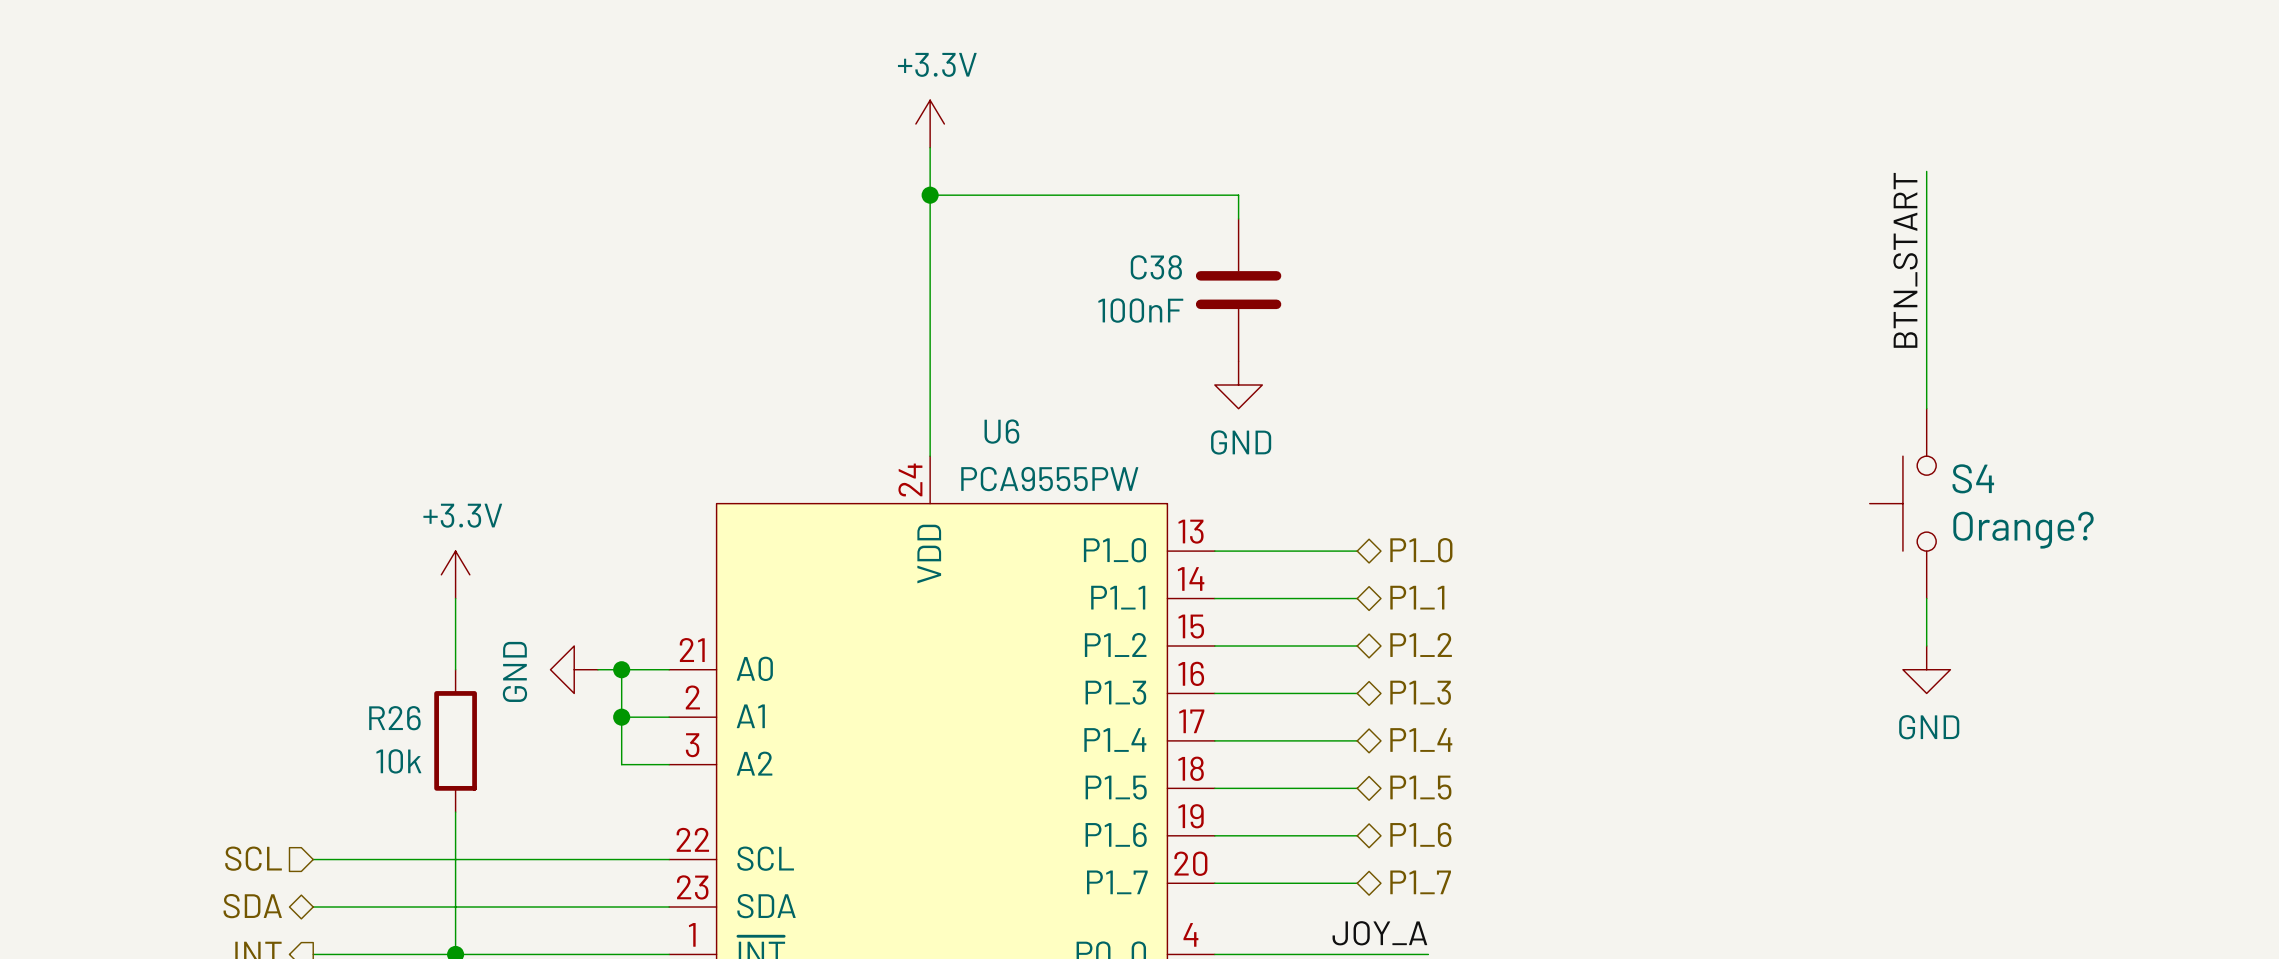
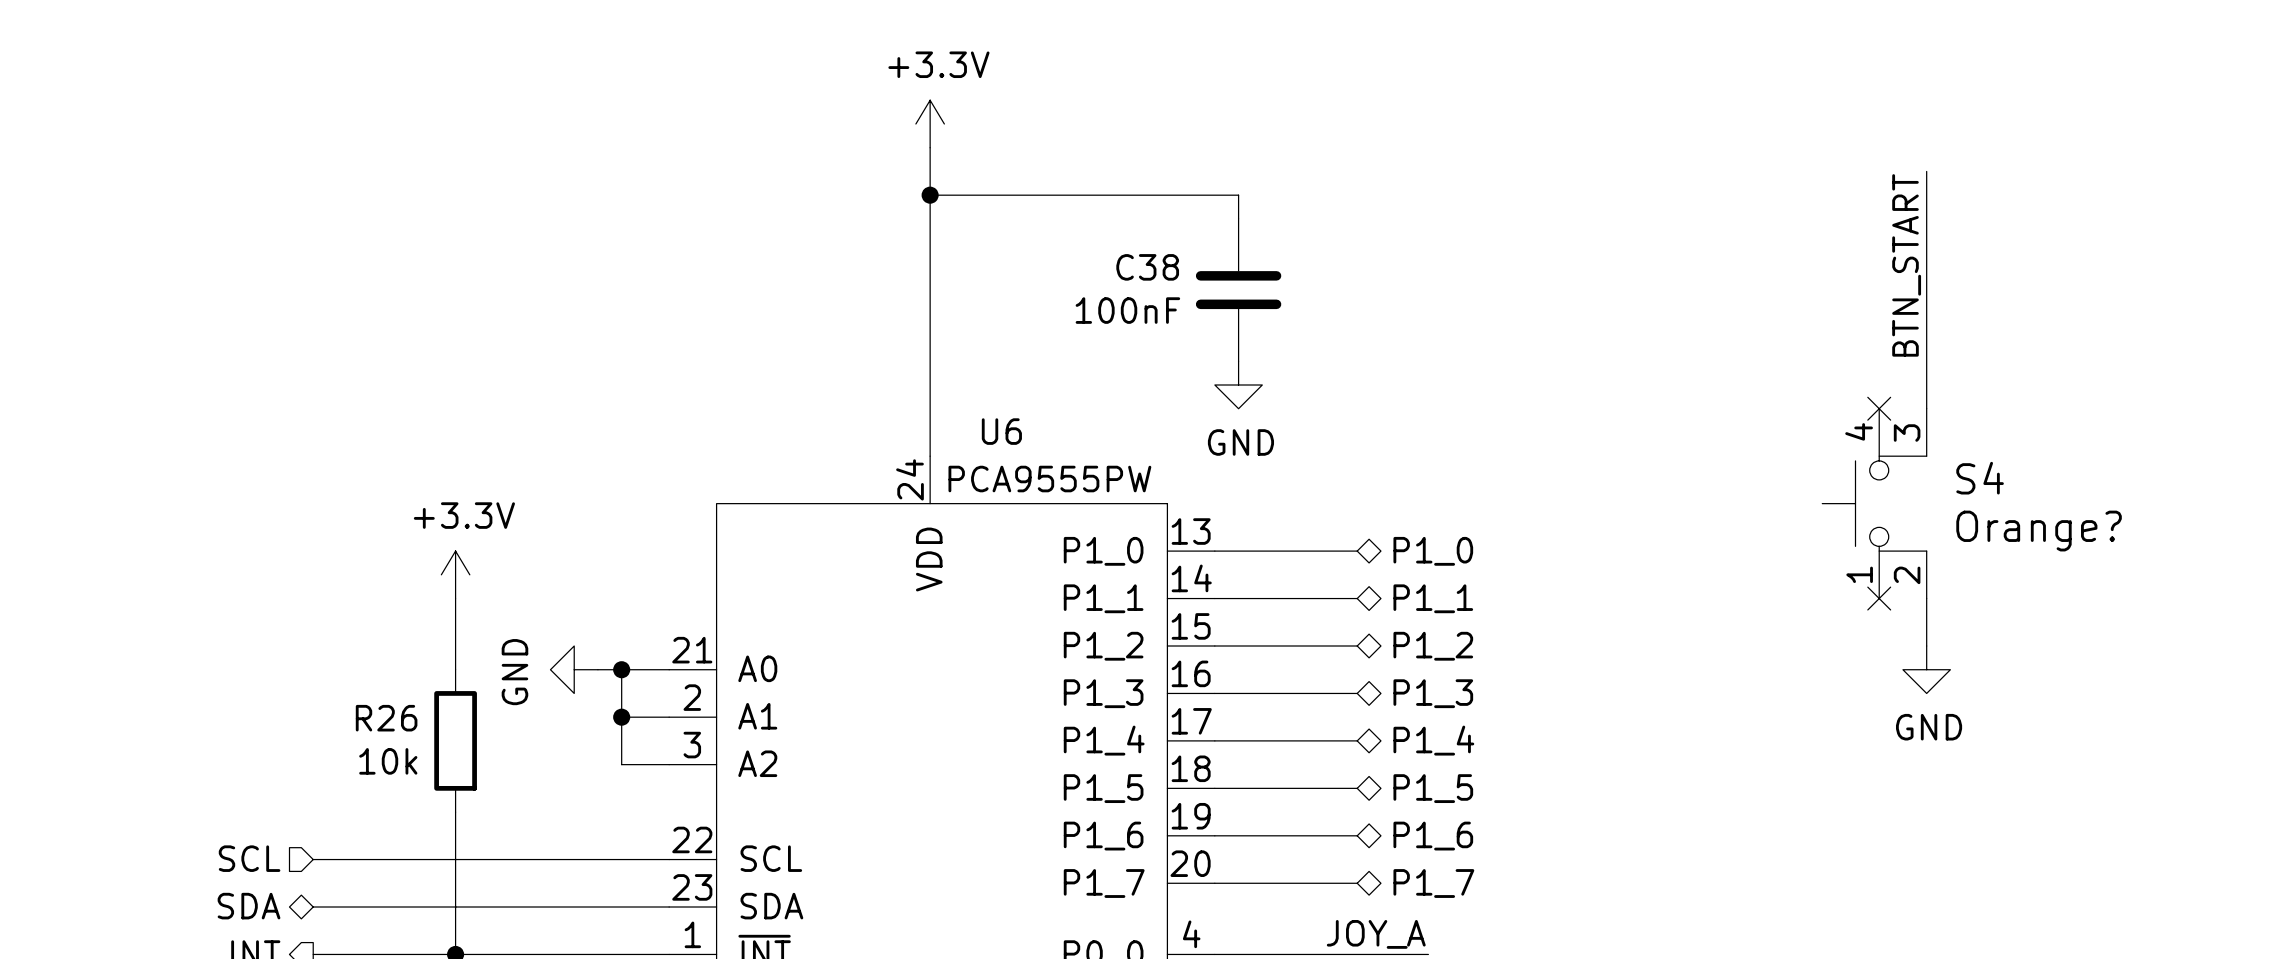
S4 symbol: [1869, 408, 1937, 599] -> [1822, 408, 1927, 599]
no-connect mark: none -> (1879, 408)
no-connect mark: none -> (1879, 598)

